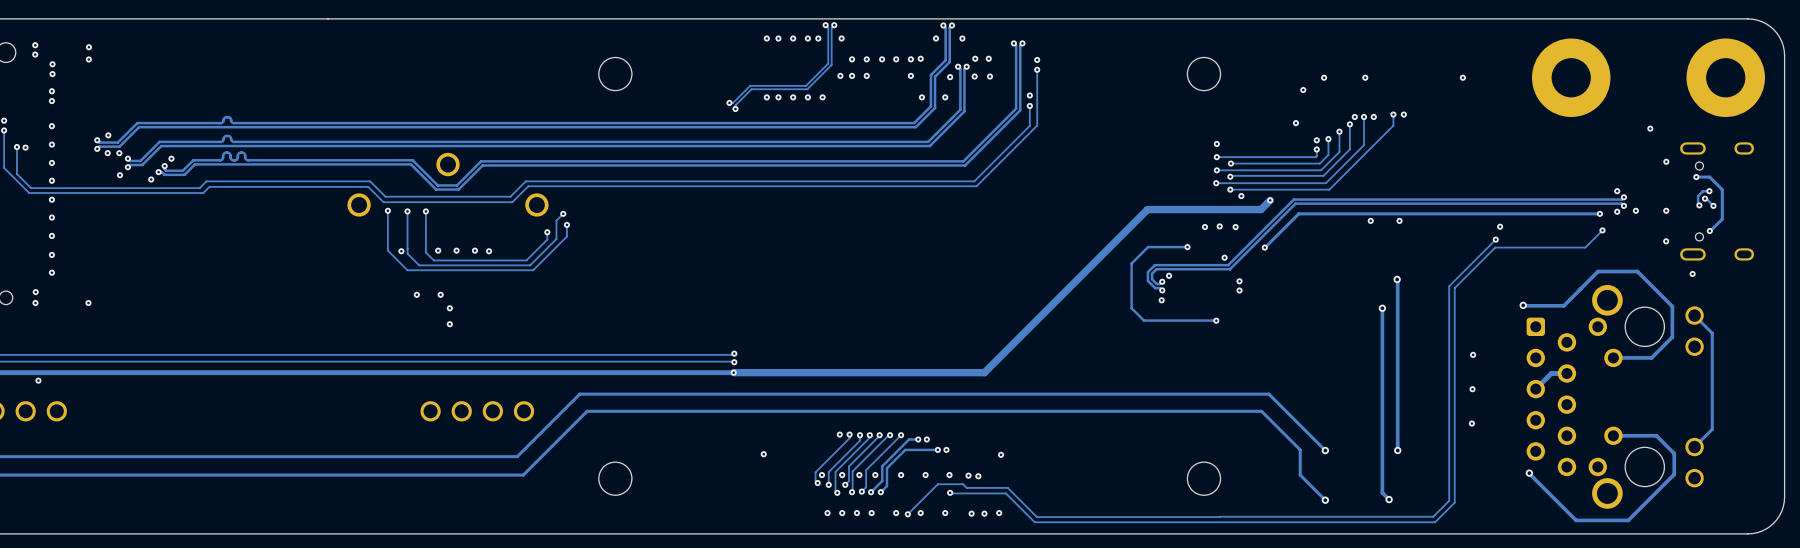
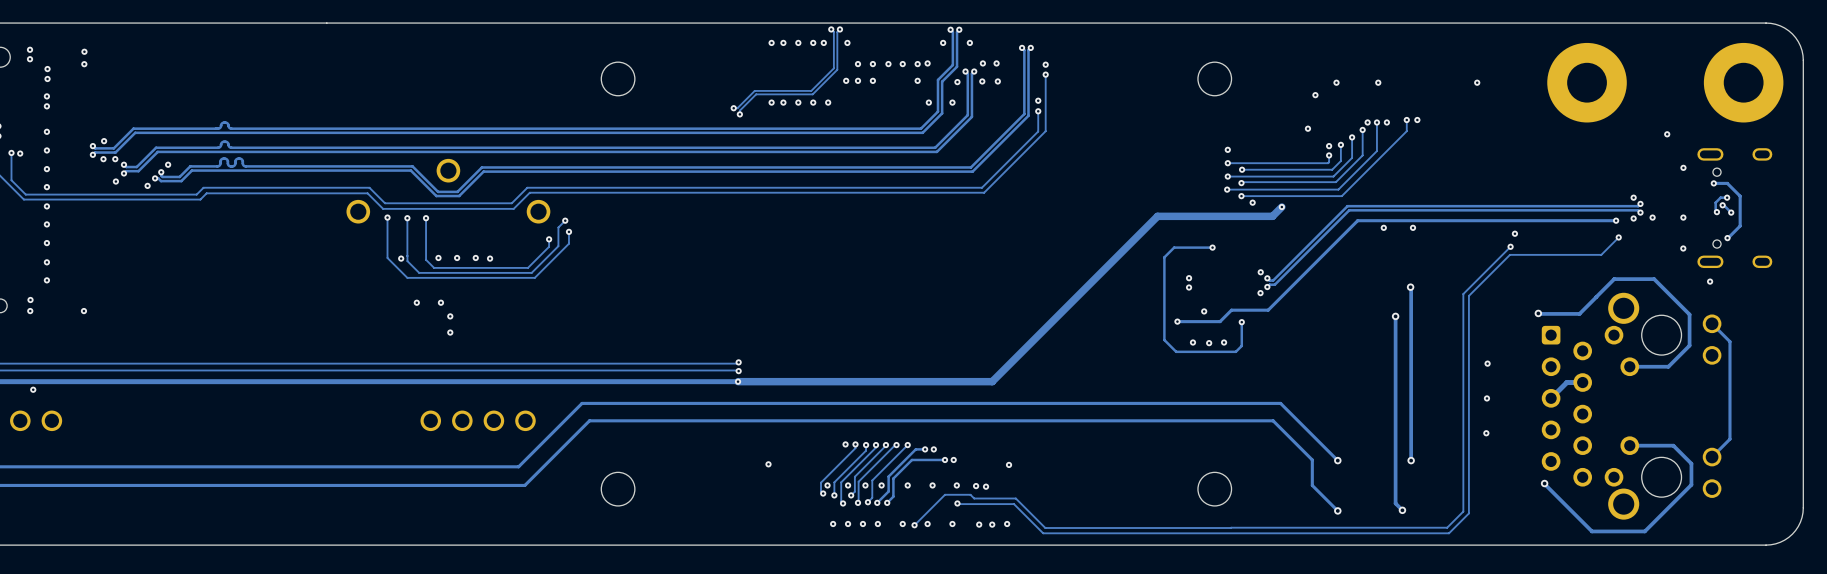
track: (1334, 199) (1293, 199) (1228, 265) (1154, 265) (1147, 272) (1147, 280) (1155, 288) (1162, 290) -> (1347, 206) (1273, 280) (1267, 278)
track: (1336, 203) (1295, 203) (1229, 269) (1156, 269) (1152, 273) (1152, 279) (1156, 284) (1162, 281) -> (1349, 210) (1274, 284) (1269, 284) (1267, 287)
track: (1344, 213) (1298, 213) (1264, 247) -> (1357, 220) (1268, 310) (1231, 310) (1220, 321) (1177, 321)
via: (1219, 226) -> none
via: (1204, 227) -> none
via: (1235, 227) -> none
track: none -> (1212, 247) (1174, 247) (1164, 257) (1164, 340) (1176, 351) (1235, 351) (1241, 345) (1241, 322)
via: none -> (1212, 247)
track: (1187, 247) (1148, 247) (1131, 263) (1131, 308) (1143, 320) (1216, 320) -> none
via: (1187, 247) -> none
via: (1264, 247) -> none
via: (1224, 257) -> none
via: none -> (1260, 272)
via: none -> (1189, 278)
via: none -> (1267, 278)
via: (1169, 275) -> none
via: none -> (1189, 287)
via: none -> (1267, 287)
via: (1162, 281) -> none
via: (1239, 281) -> none
via: none -> (1260, 293)
via: (1162, 290) -> none
via: (1239, 290) -> none
via: (1161, 300) -> none
via: none -> (1204, 311)
via: none -> (1177, 321)
via: none -> (1241, 322)
via: (1216, 320) -> none
via: none -> (1192, 342)
via: none -> (1209, 343)
via: none -> (1224, 342)

